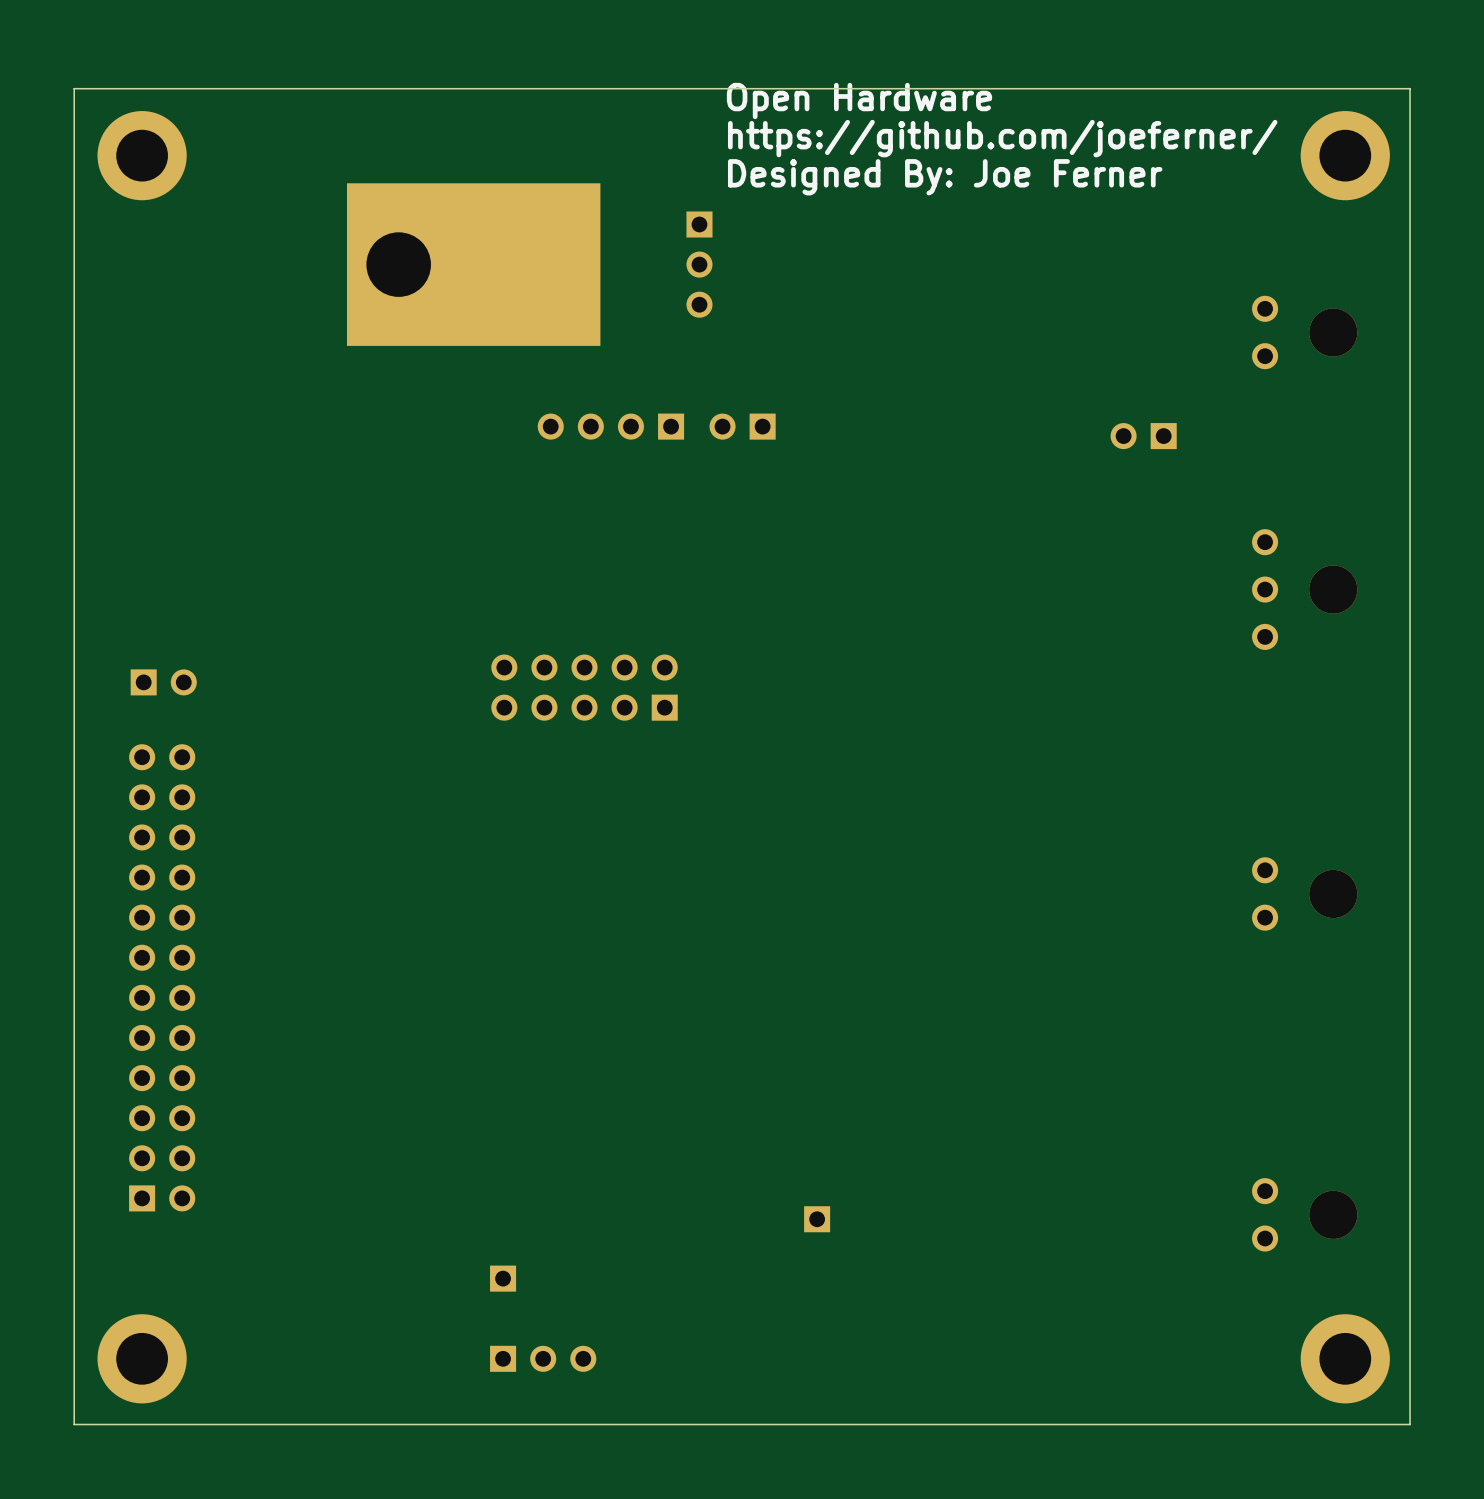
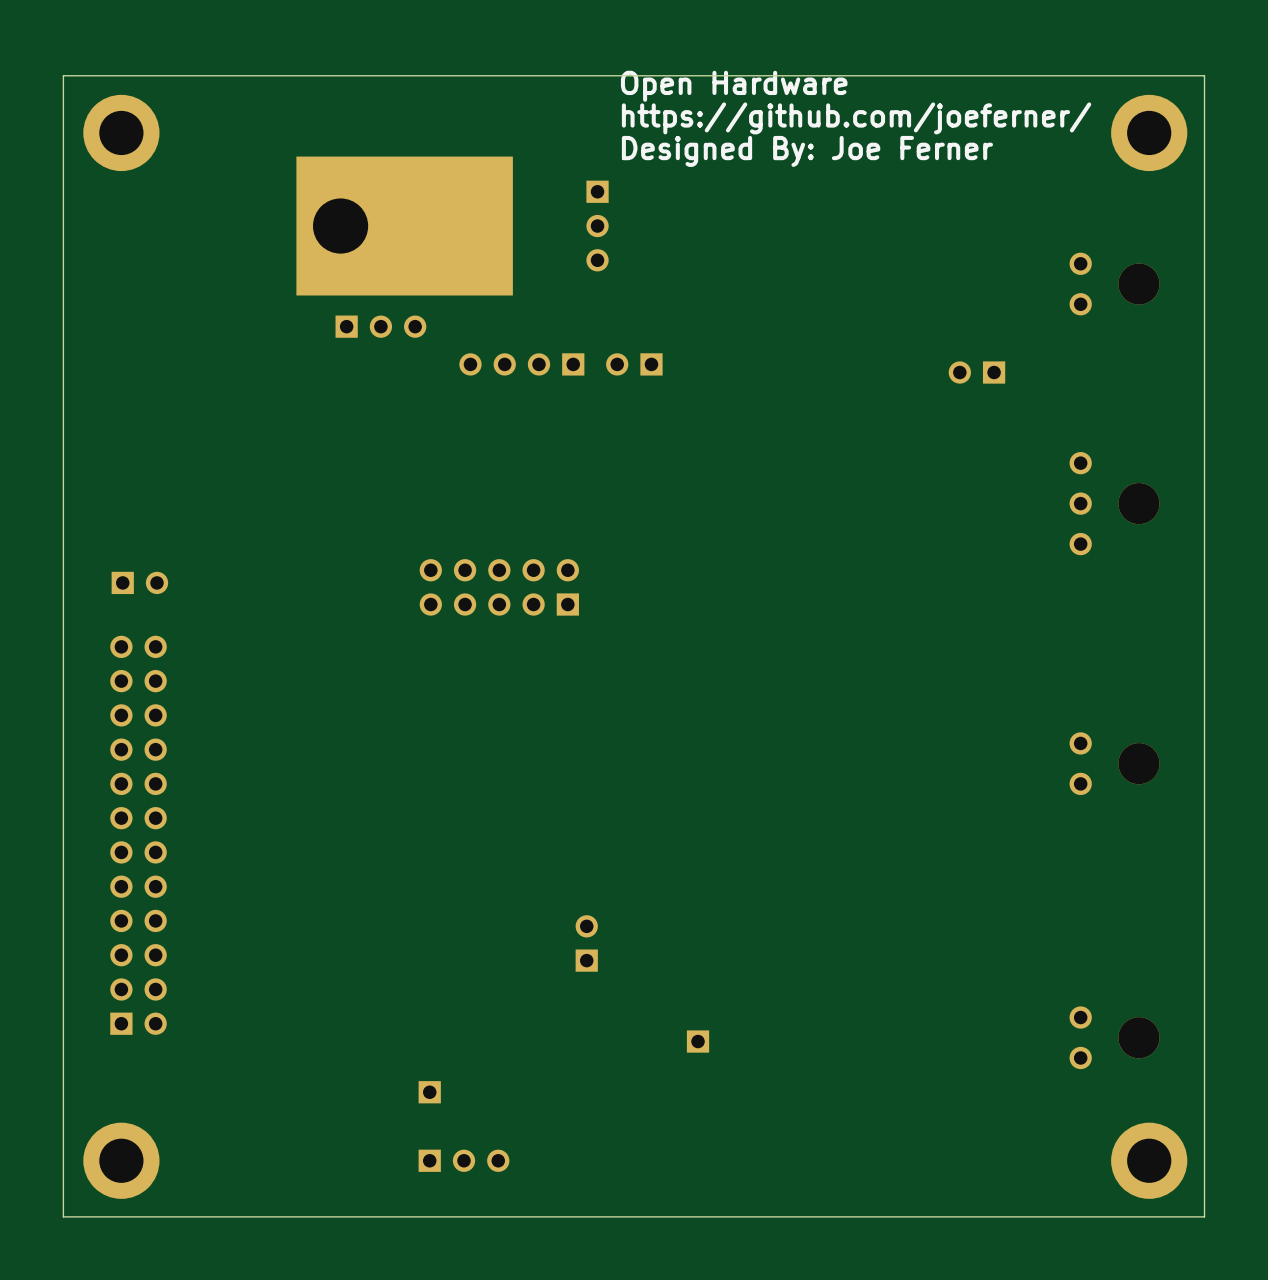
part: none -> (380, 326)
part: none -> (586, 943)

